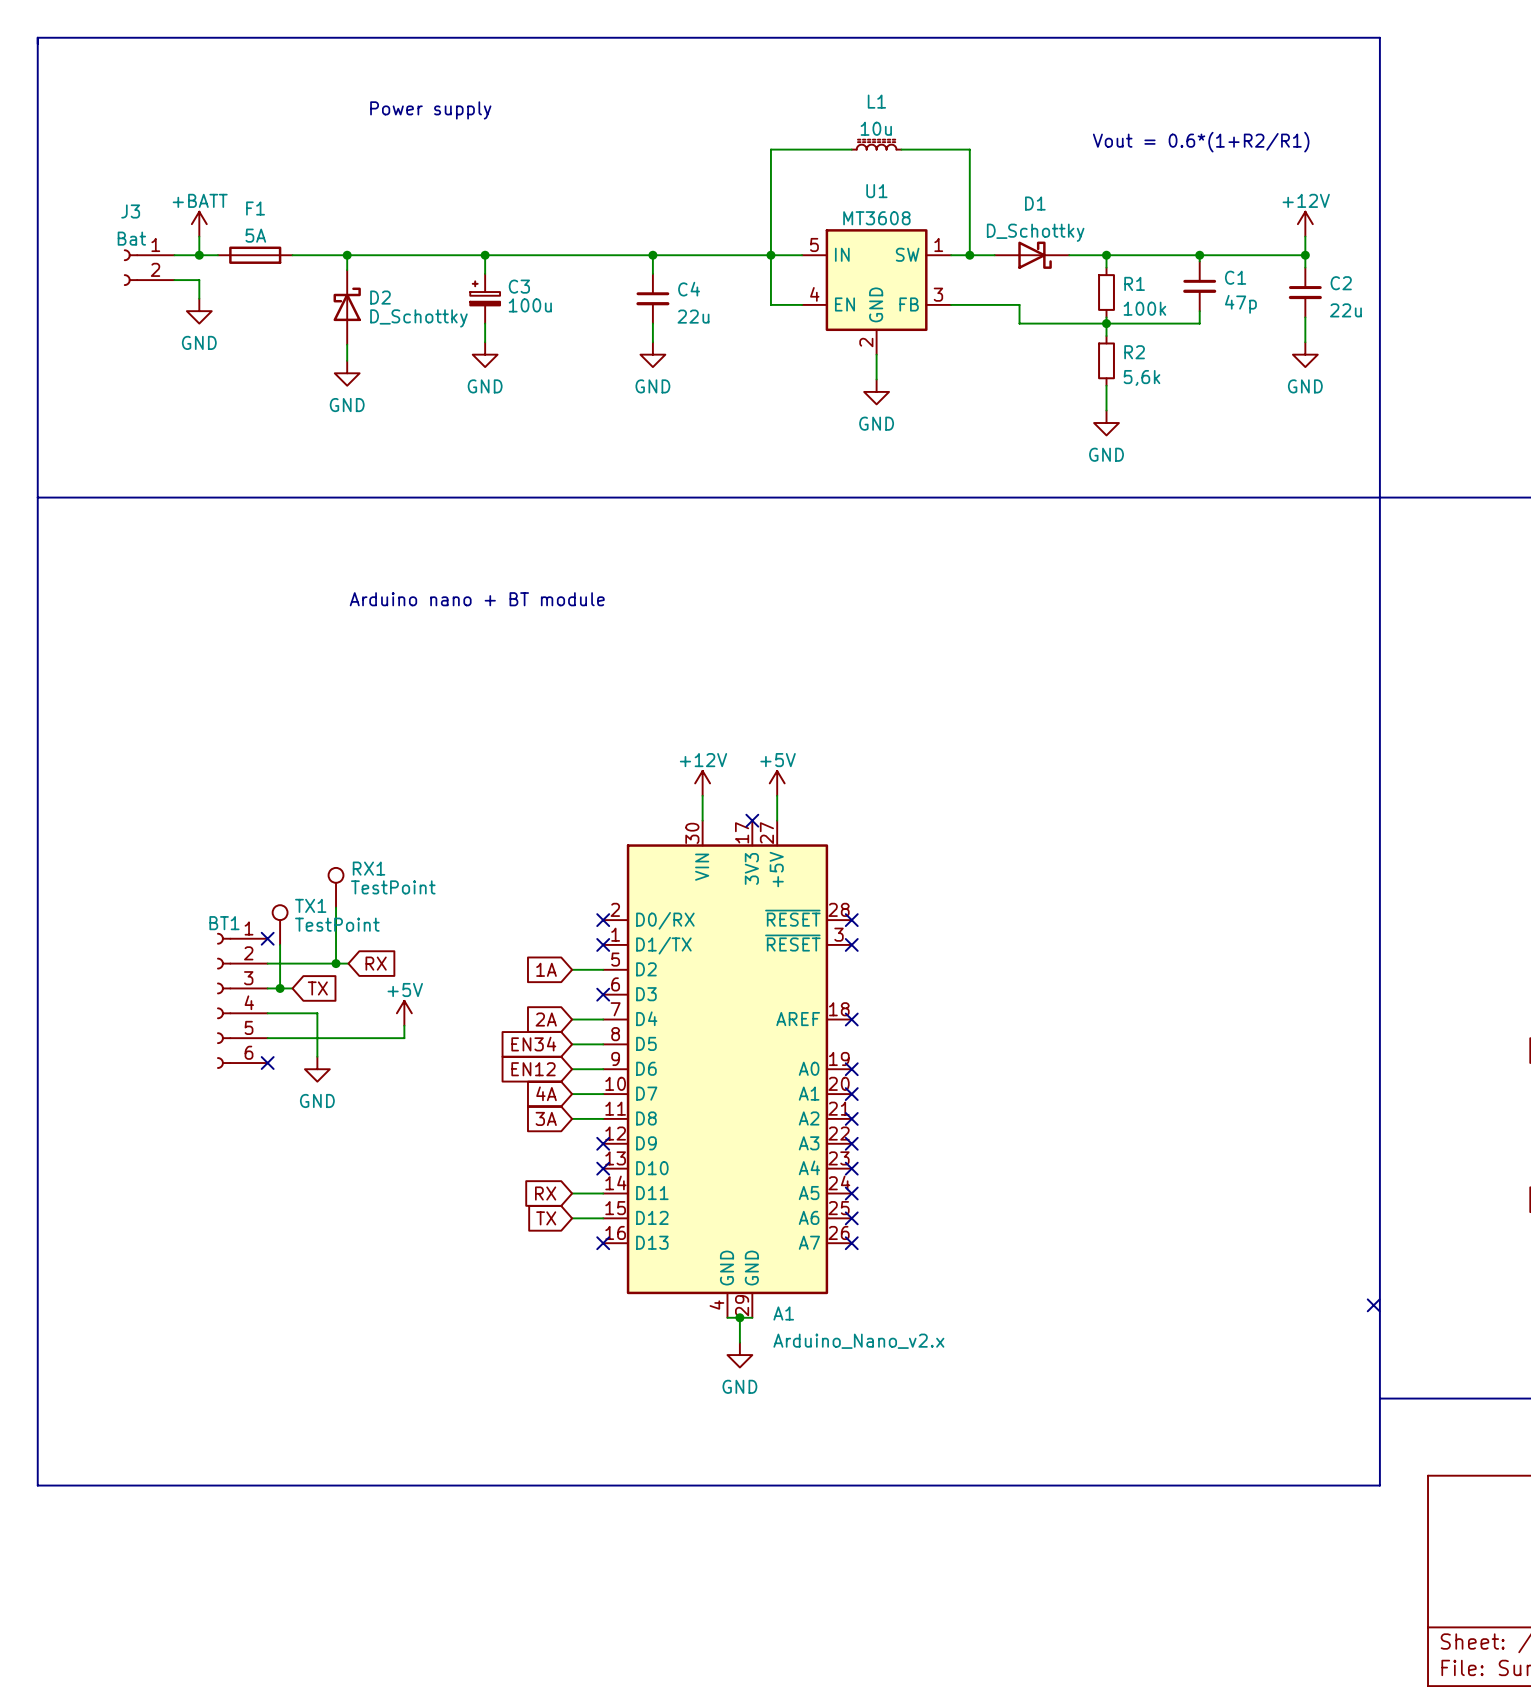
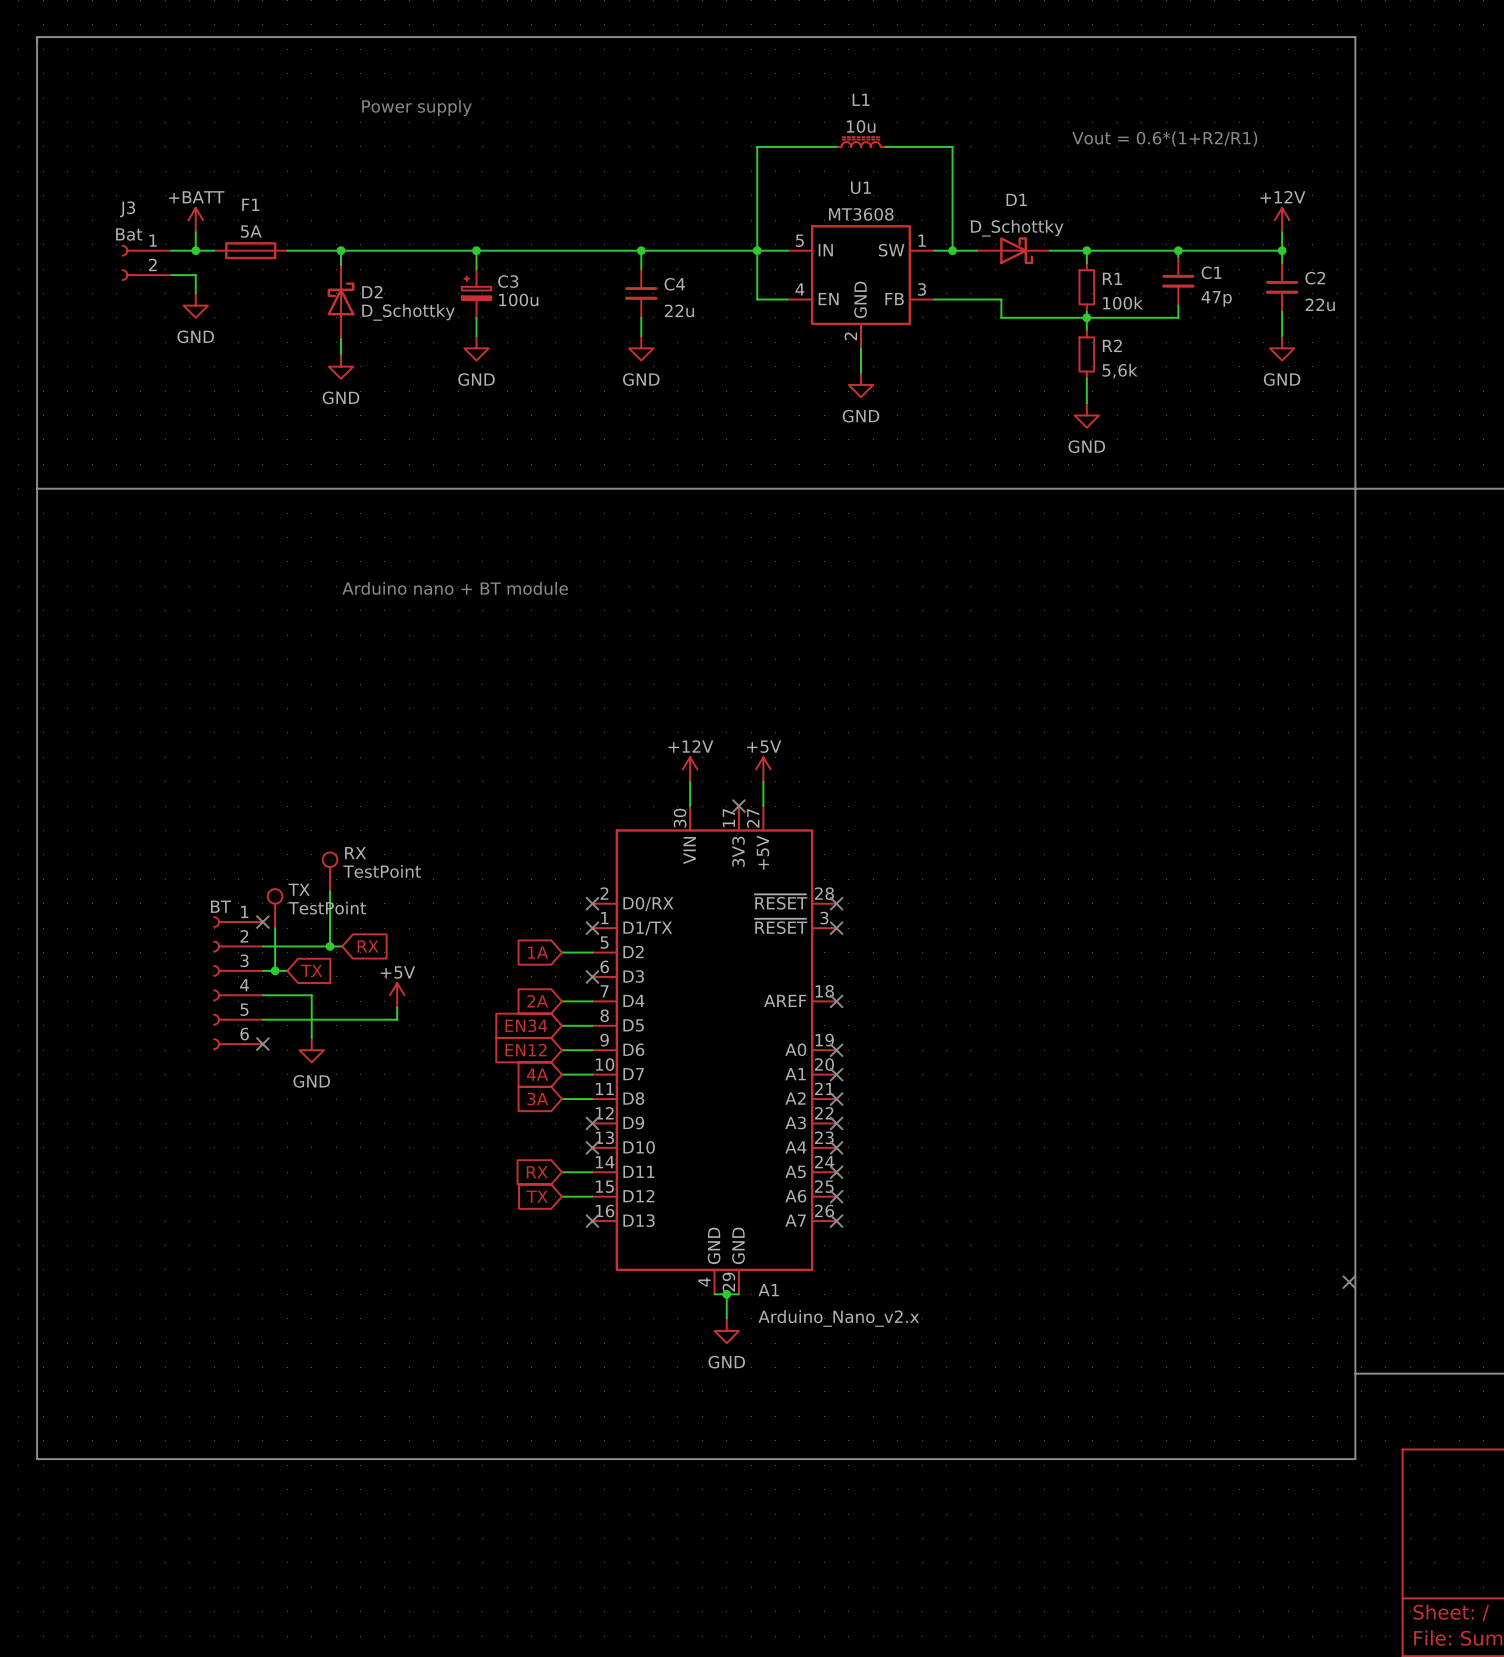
RX1 name: RX1 (369, 868) -> RX (355, 853)
TX1 name: TX1 (310, 905) -> TX (299, 889)
BT1 name: BT1 (224, 923) -> BT (221, 906)

